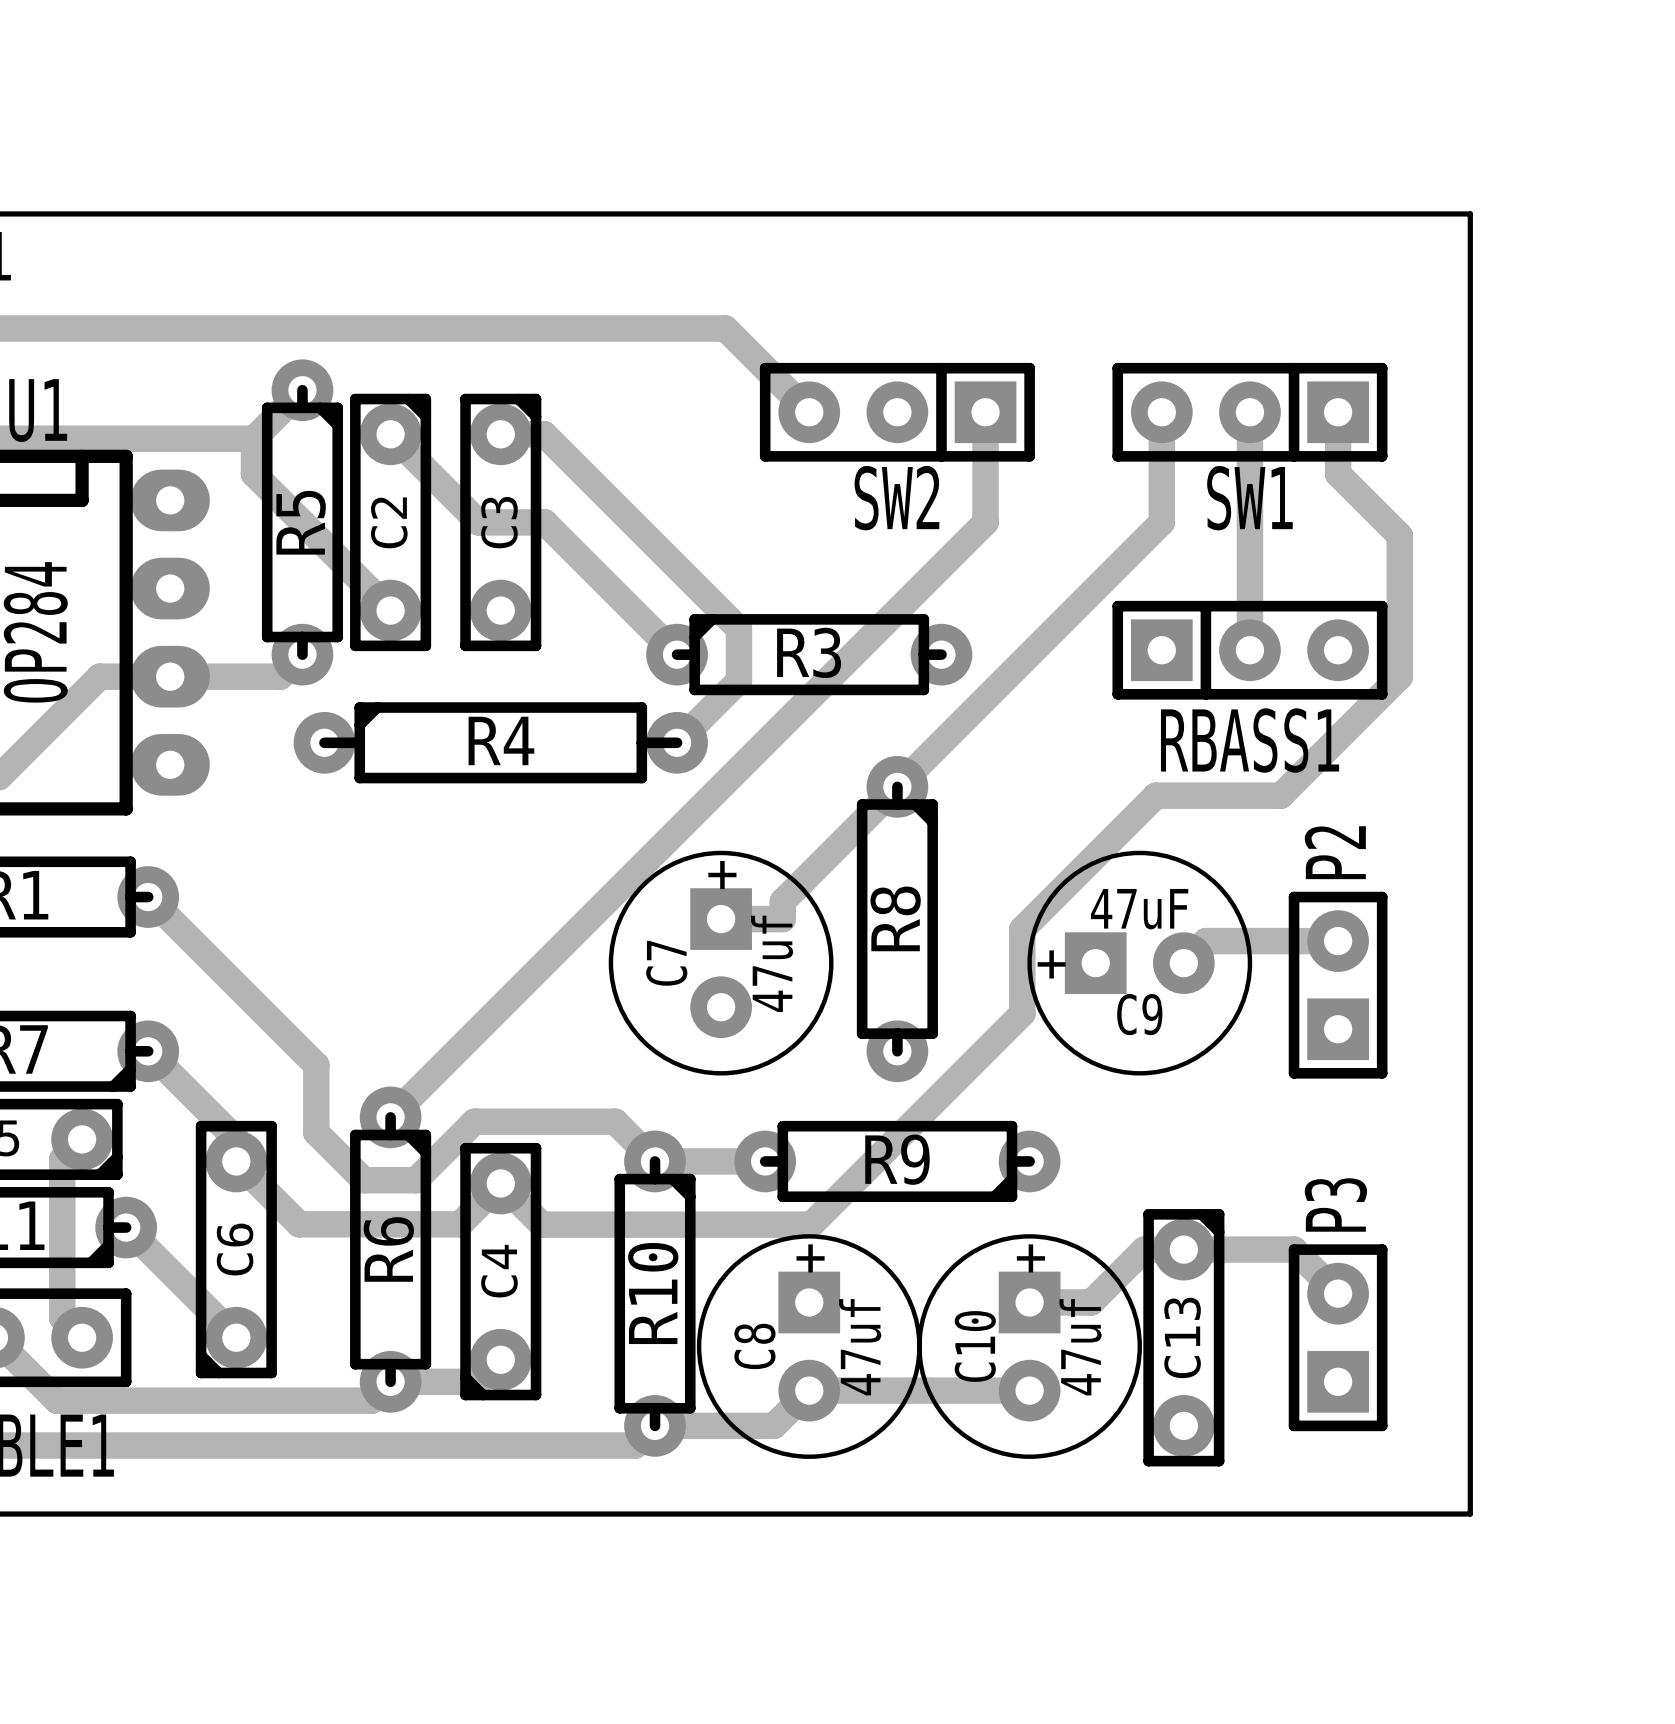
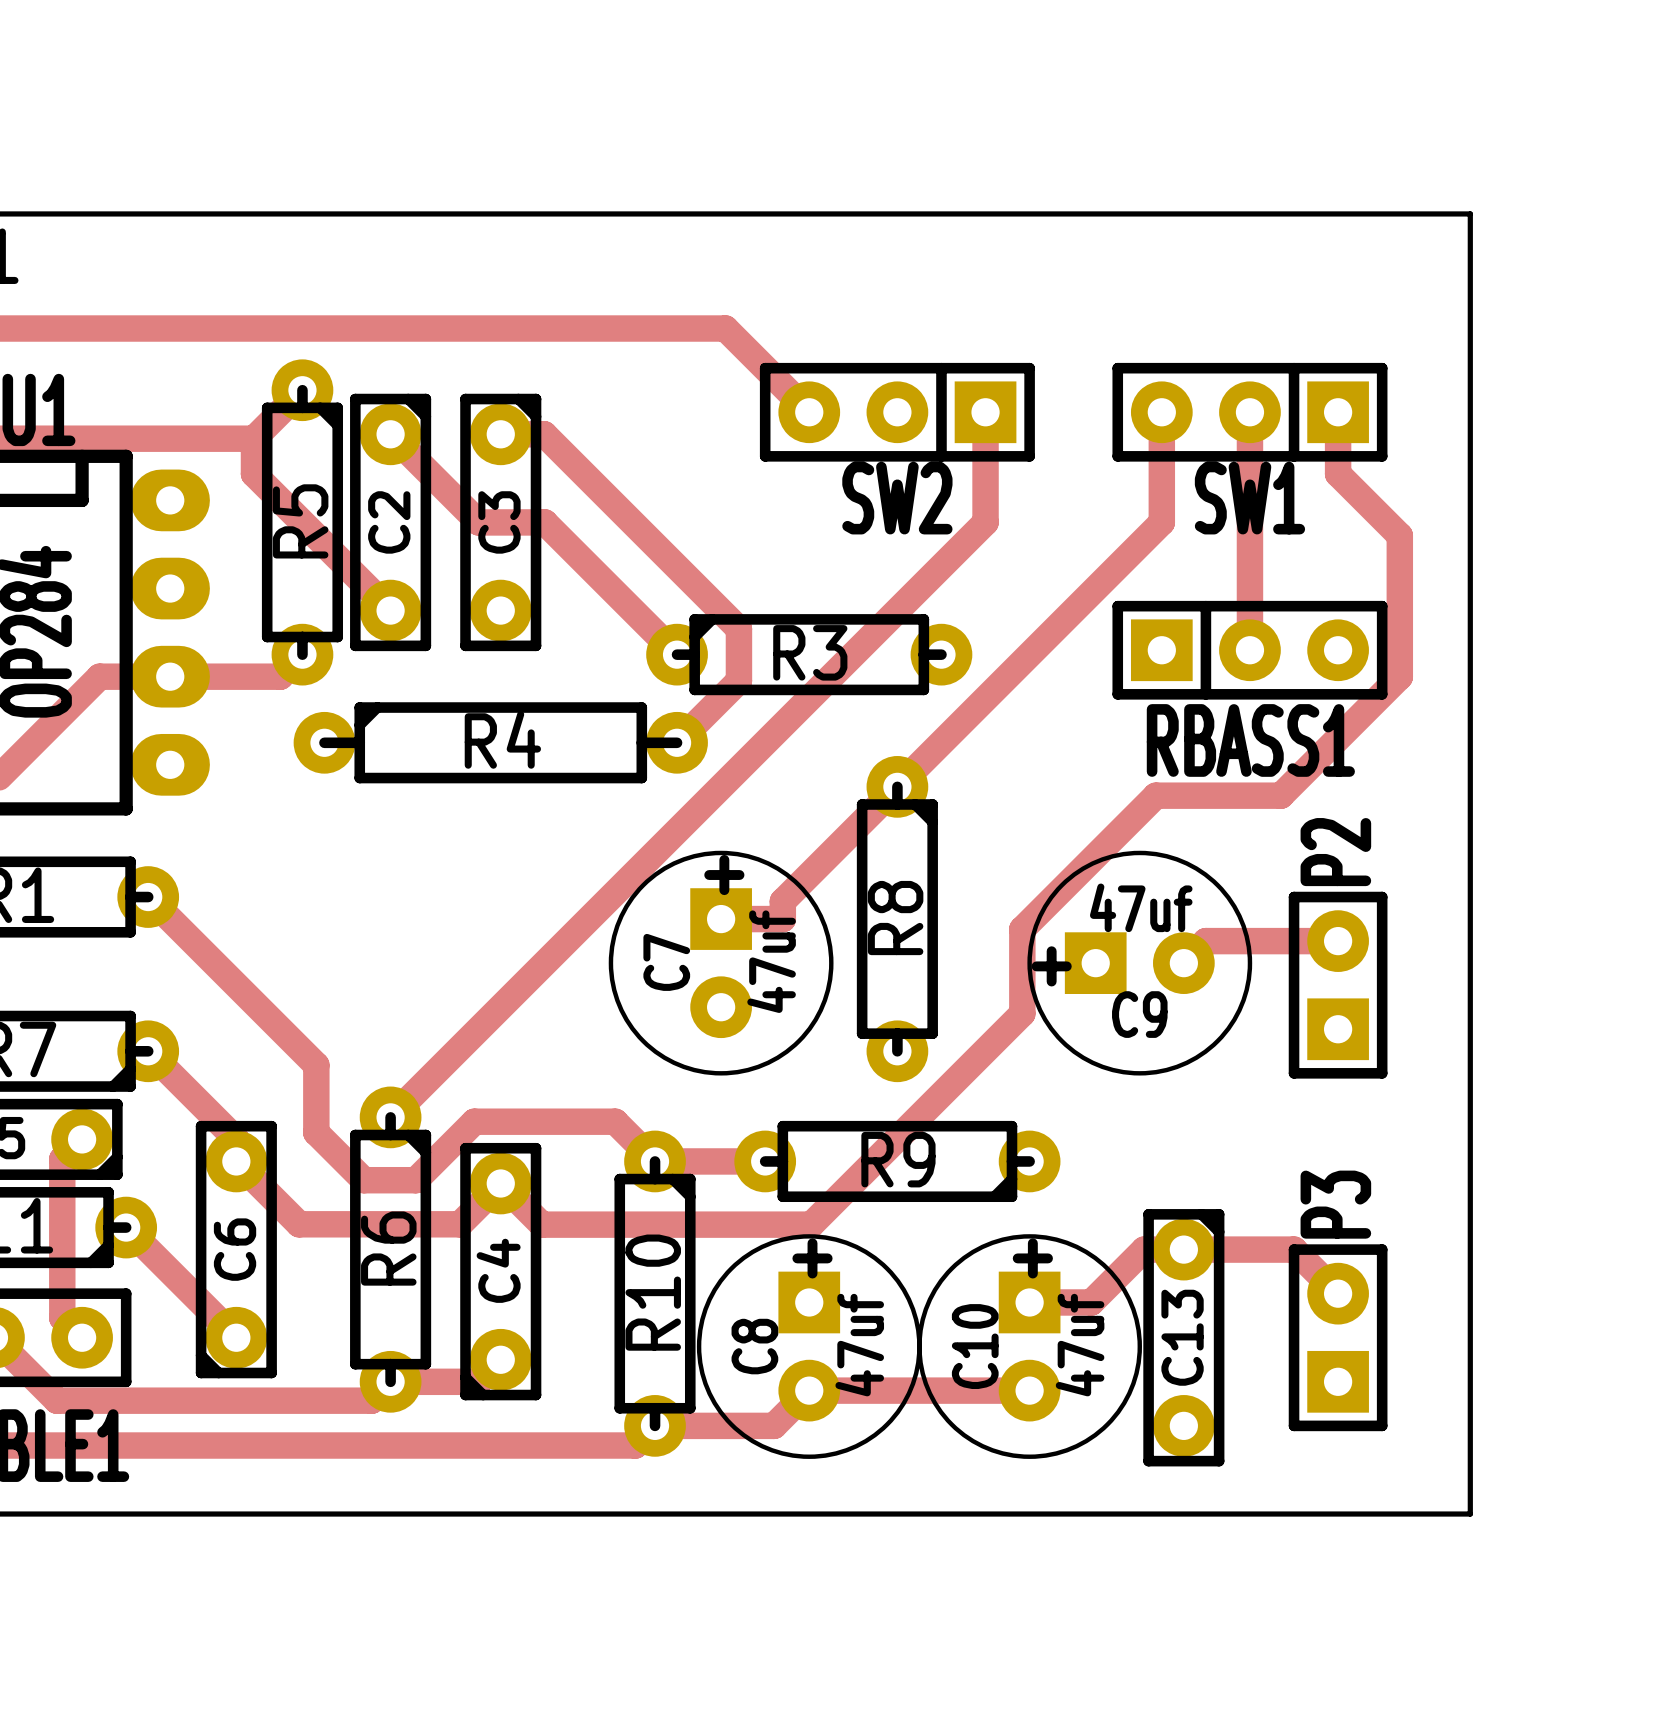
C9 value: 47uF (1139, 909) -> 47uf (1141, 907)

